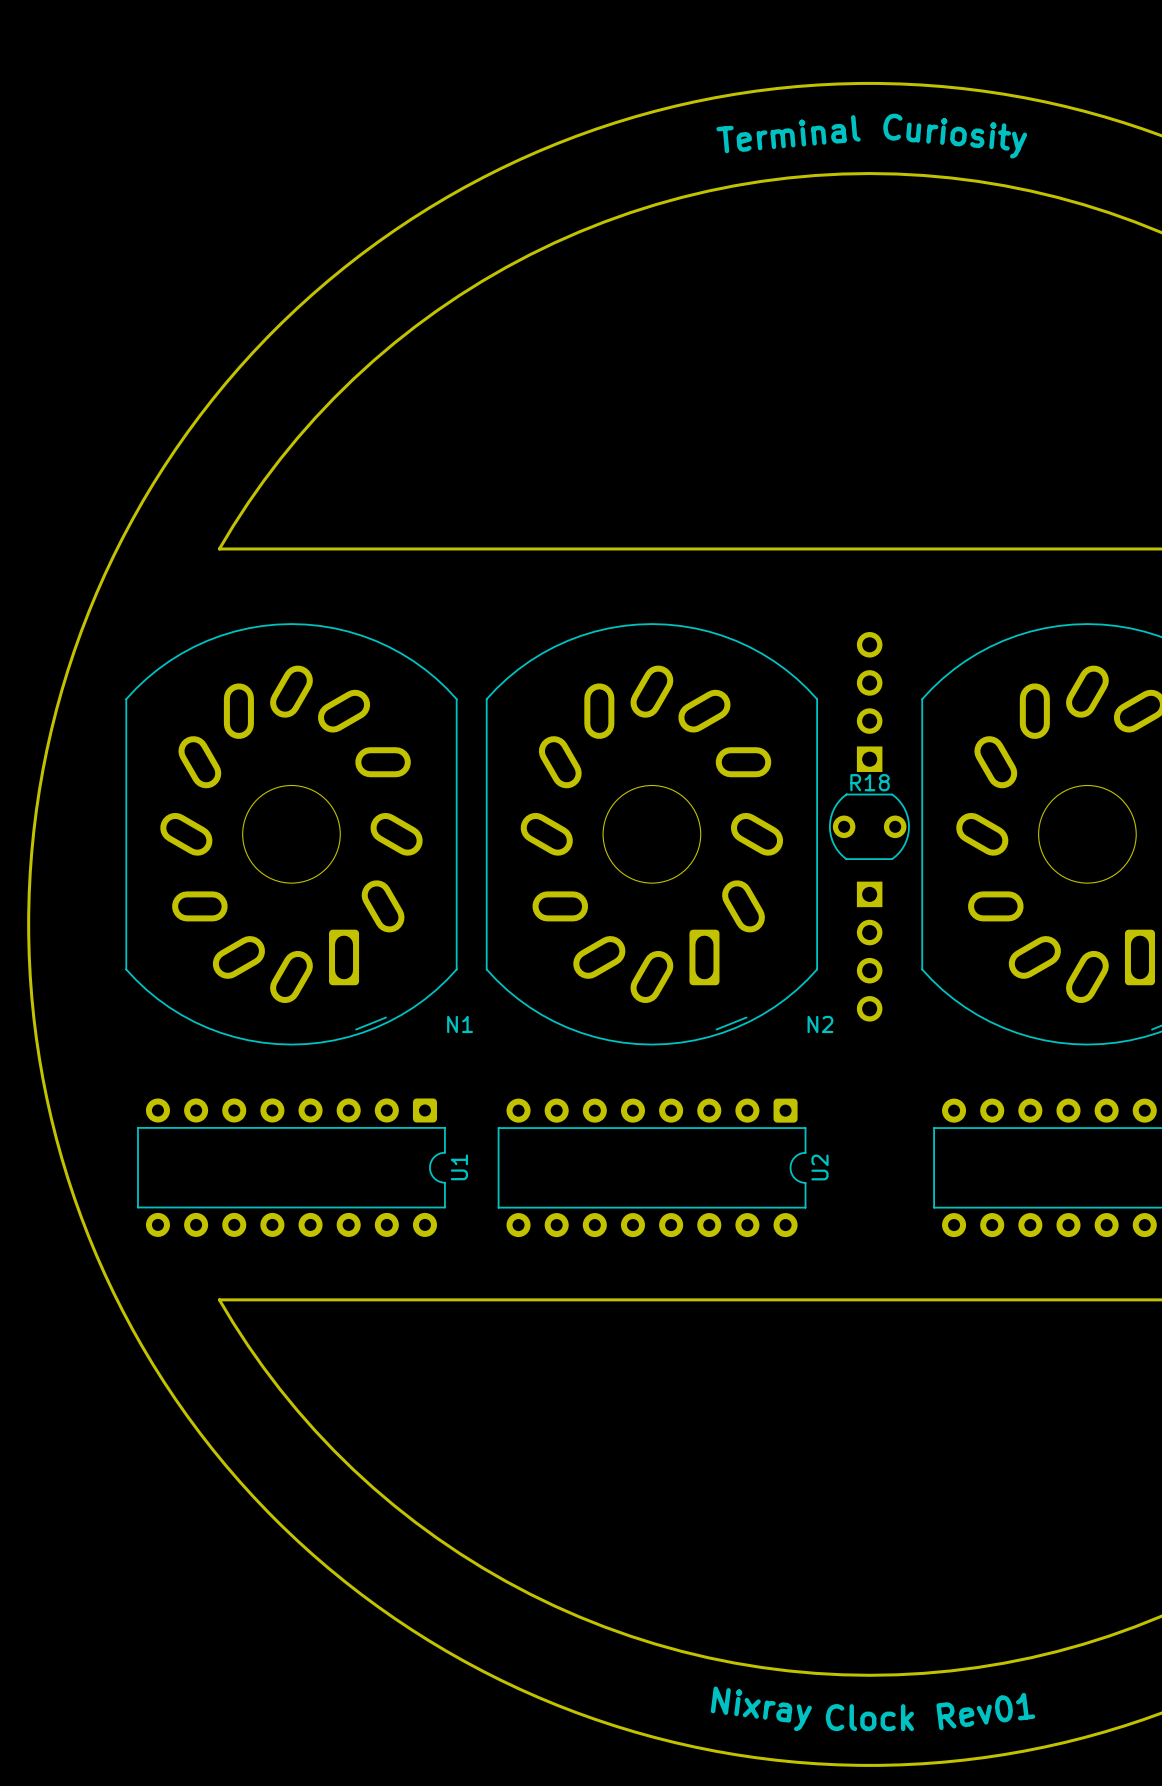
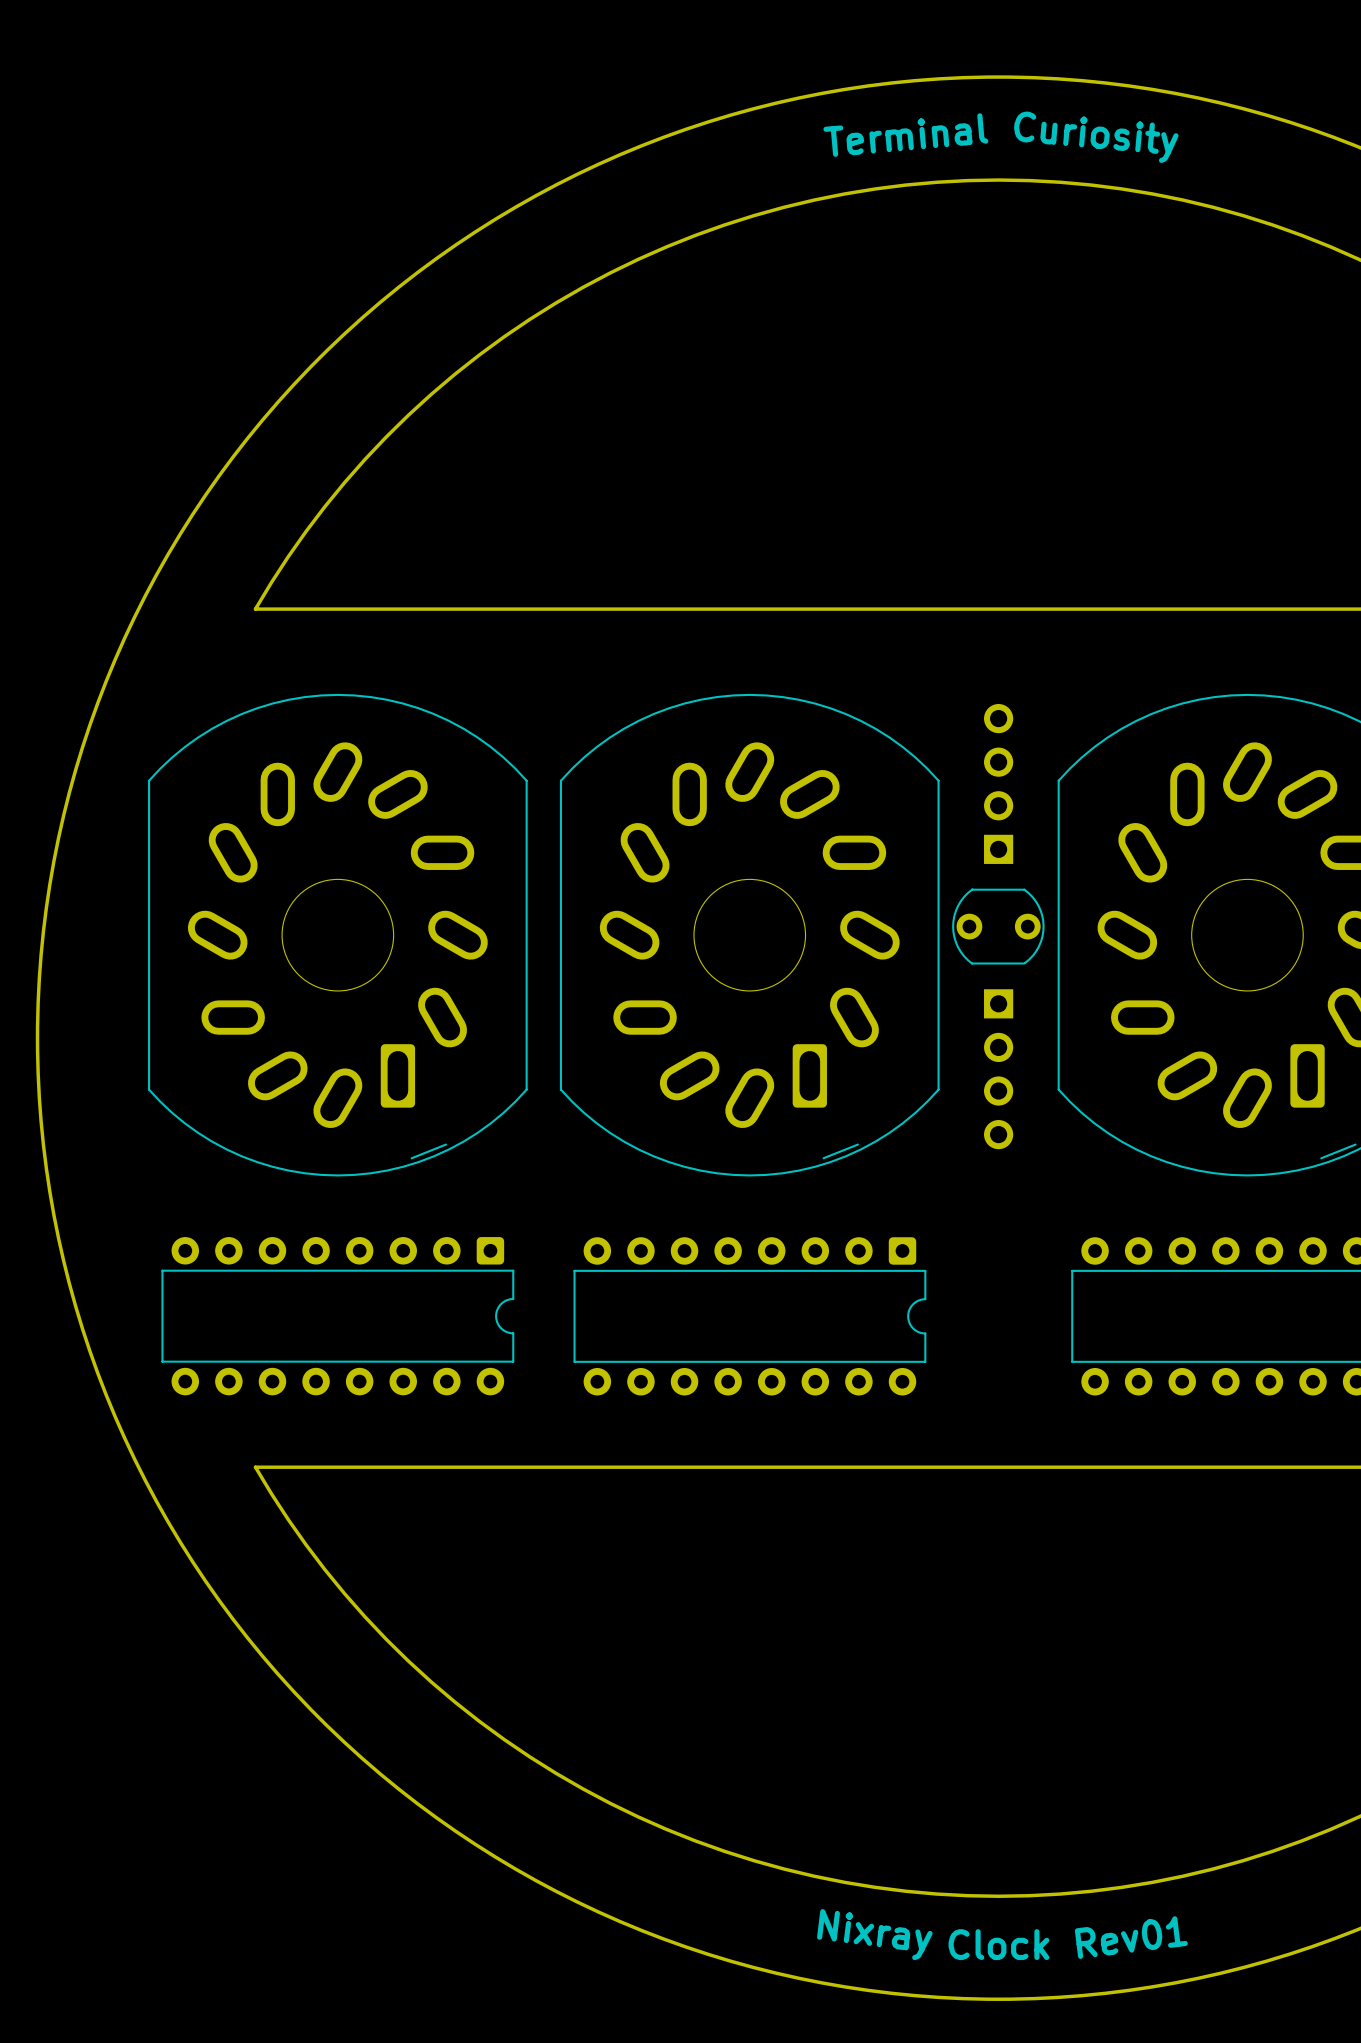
R18 name: R18 (870, 782) -> none
N1 name: N1 (460, 1024) -> none
N2 name: N2 (820, 1024) -> none
U1 name: U1 (459, 1167) -> none
U2 name: U2 (819, 1167) -> none

